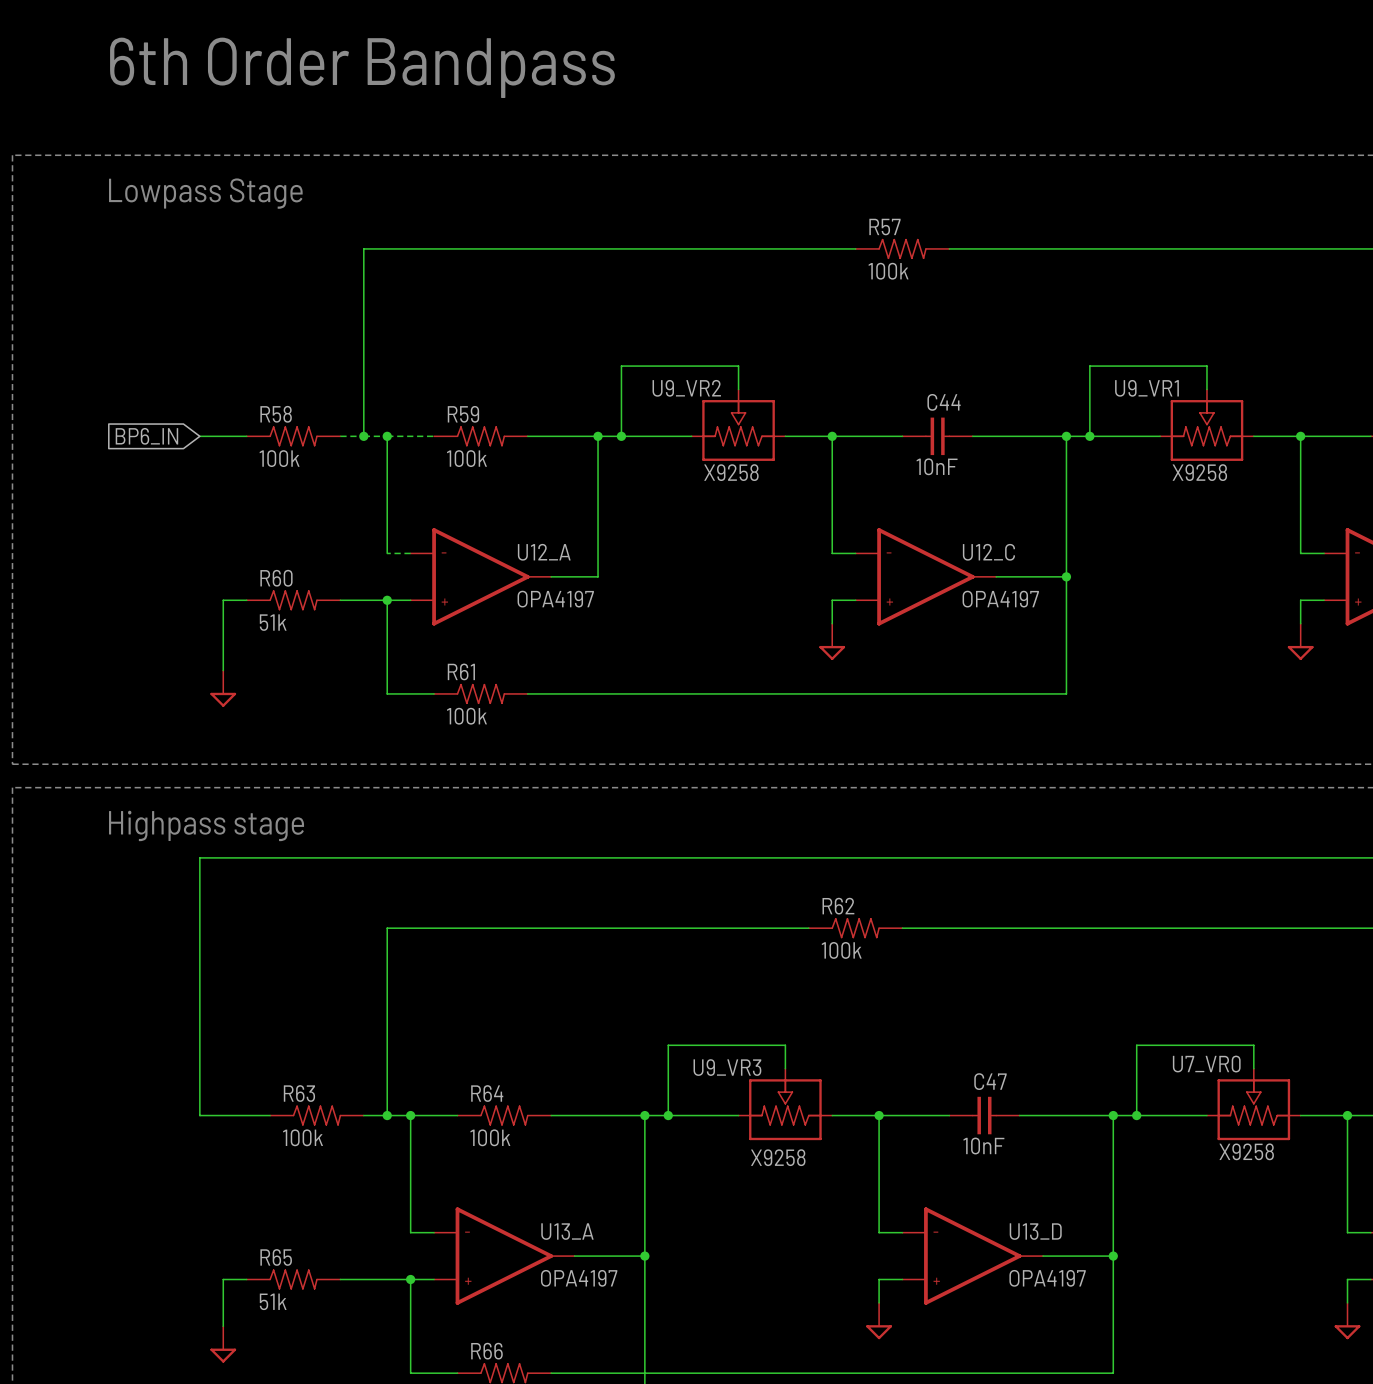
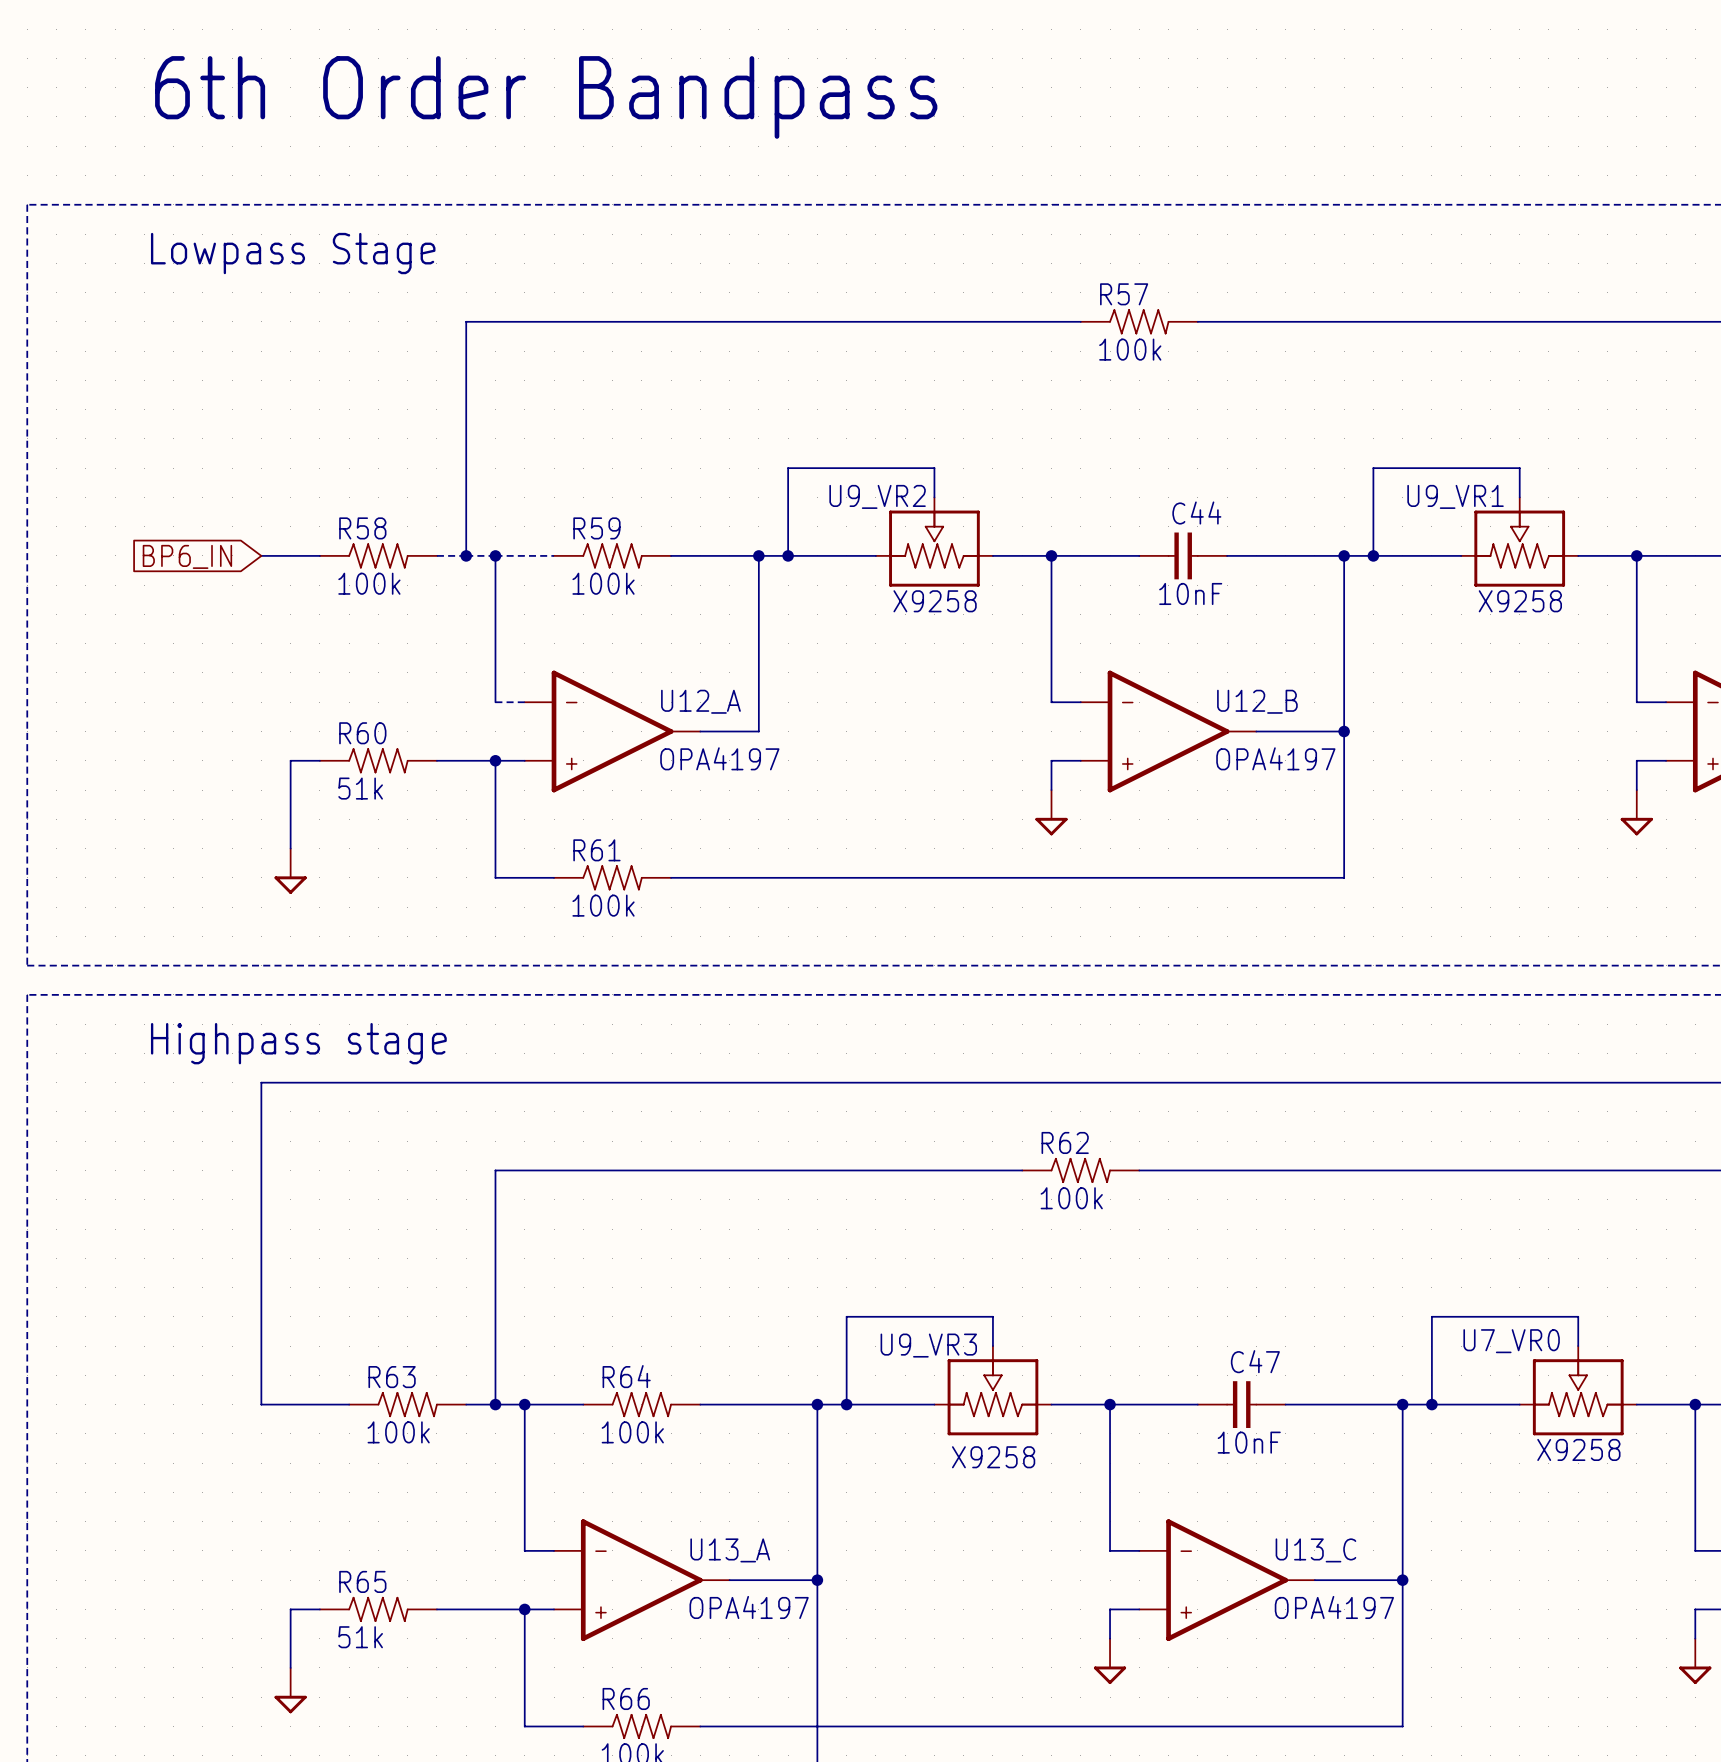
U12_C name: U12_C (988, 552) -> U12_B (1257, 701)
U13_D name: U13_D (1035, 1231) -> U13_C (1315, 1550)

